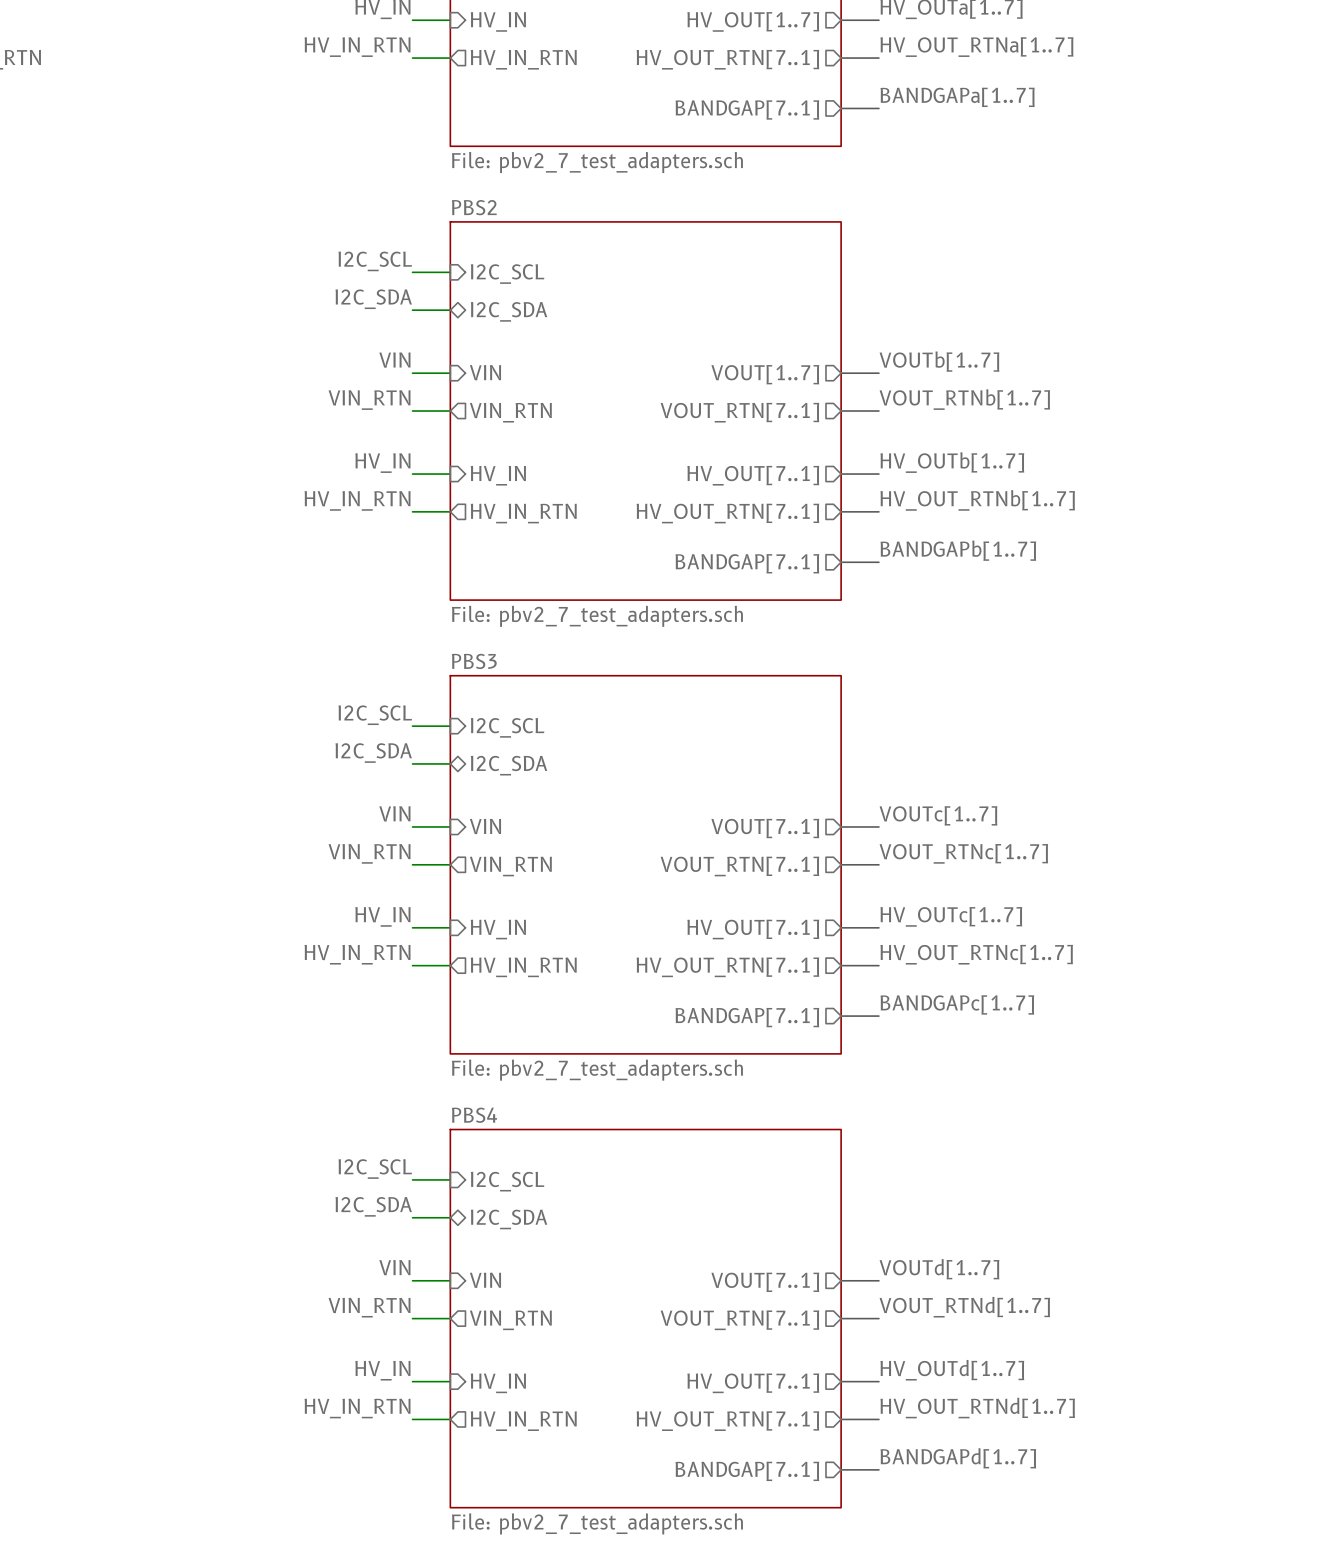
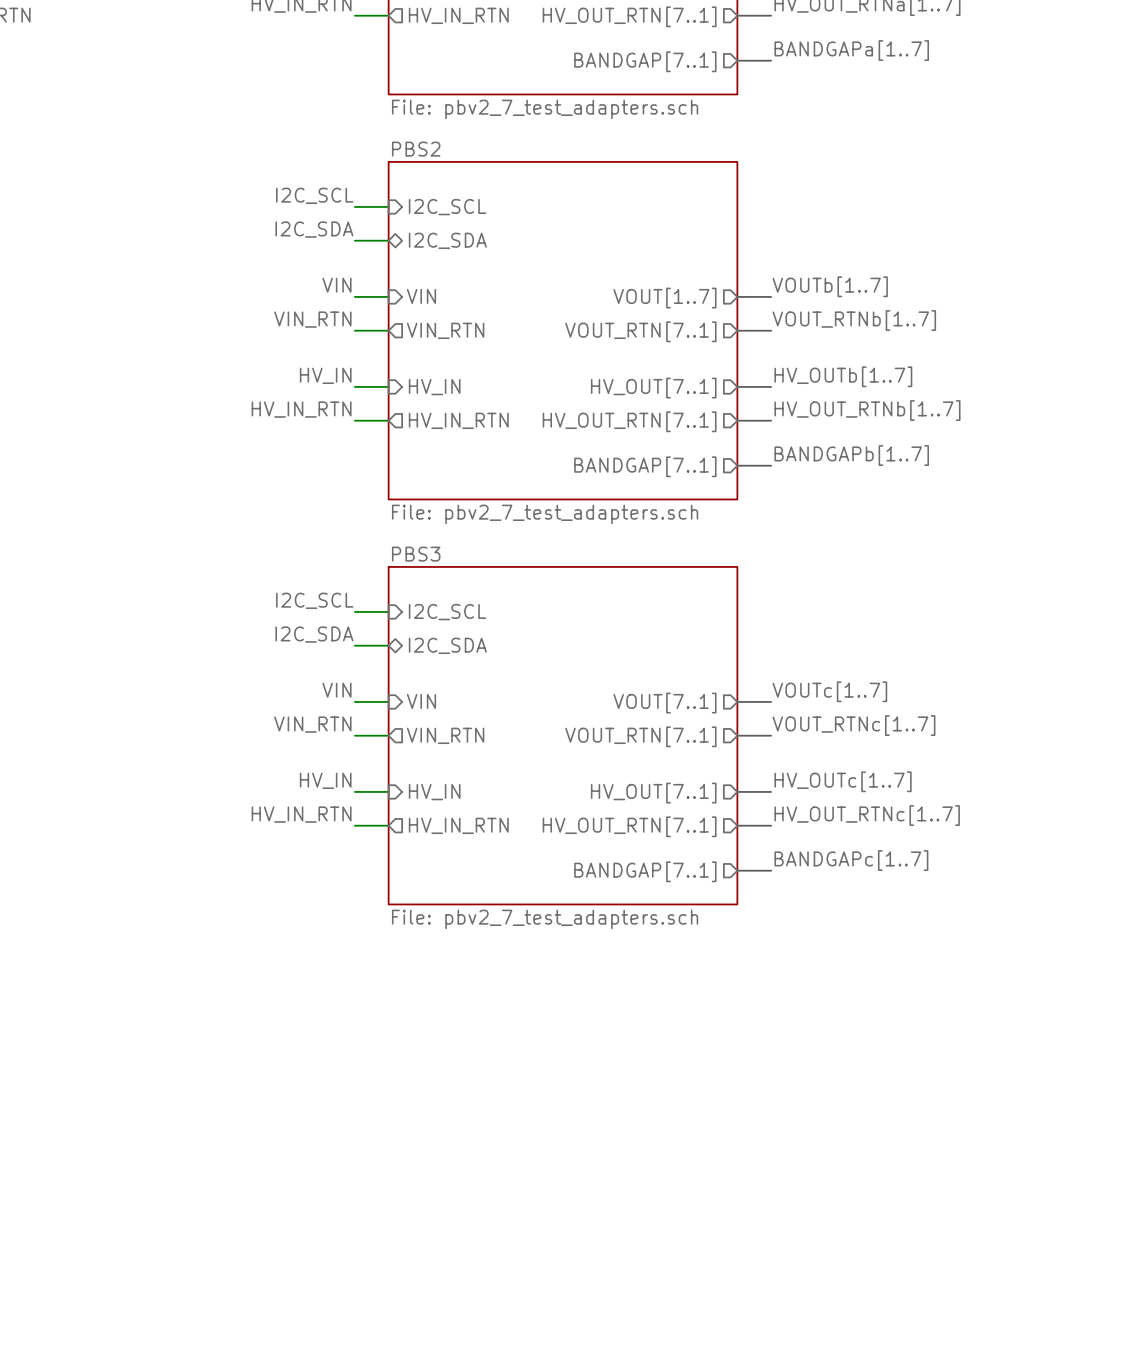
label: I2C_SCL (375, 1169) -> none
wire: (412, 1179) (450, 1179) -> none
sheet pin: I2C_SCL (507, 1181) -> none
label: I2C_SDA (373, 1206) -> none
wire: (412, 1217) (450, 1217) -> none
sheet pin: I2C_SDA (509, 1219) -> none
label: VIN (394, 1267) -> none
label: VOUTd[1..7] (939, 1269) -> none
wire: (412, 1280) (450, 1280) -> none
sheet pin: VIN (485, 1280) -> none
bus: (841, 1280) (878, 1280) -> none
sheet pin: VOUT[7..1] (765, 1282) -> none
label: VIN_RTN (369, 1307) -> none
label: VOUT_RTNd[1..7] (964, 1307) -> none
wire: (412, 1318) (450, 1318) -> none
sheet PBS4: File: pbv2_7_test_adapters.sch (645, 1318) -> none
bus: (841, 1318) (878, 1318) -> none
sheet pin: VIN_RTN (510, 1320) -> none
sheet pin: VOUT_RTN[7..1] (739, 1320) -> none
label: HV_IN (382, 1370) -> none
label: HV_OUTd[1..7] (952, 1370) -> none
wire: (412, 1381) (450, 1381) -> none
bus: (841, 1381) (878, 1381) -> none
sheet pin: HV_IN (498, 1383) -> none
sheet pin: HV_OUT[7..1] (753, 1383) -> none
label: HV_IN_RTN (357, 1408) -> none
label: HV_OUT_RTNd[1..7] (977, 1408) -> none
wire: (412, 1419) (450, 1419) -> none
bus: (841, 1419) (878, 1419) -> none
sheet pin: HV_IN_RTN (523, 1421) -> none
sheet pin: HV_OUT_RTN[7..1] (727, 1421) -> none
label: BANDGAPd[1..7] (958, 1458) -> none
bus: (841, 1469) (878, 1469) -> none
sheet pin: BANDGAP[7..1] (747, 1471) -> none

